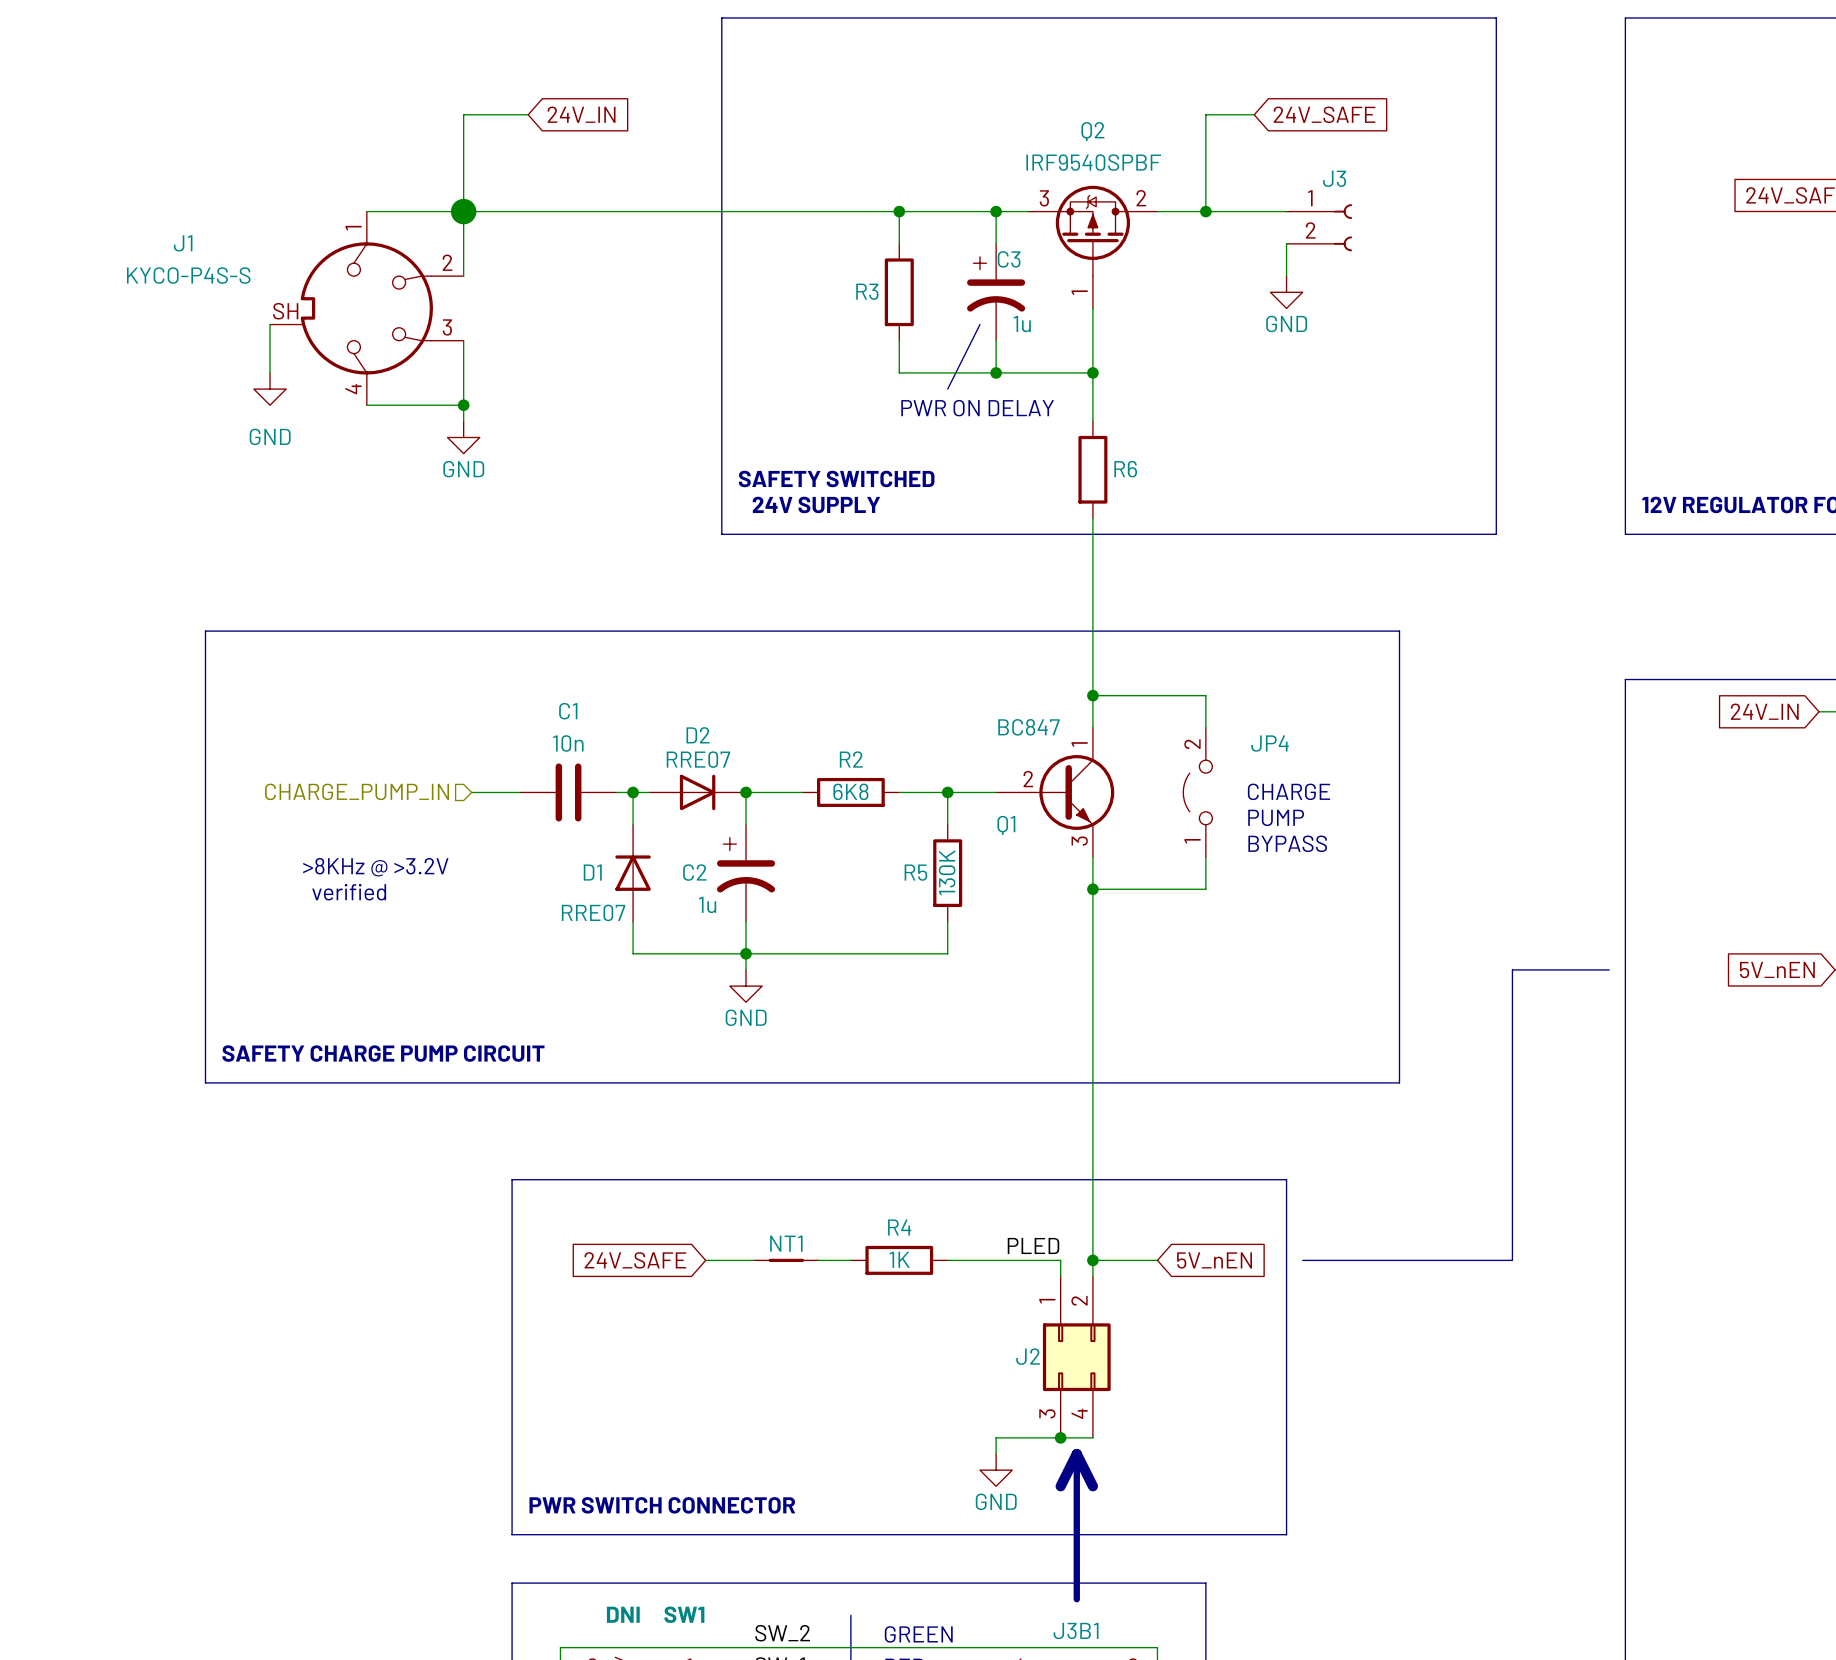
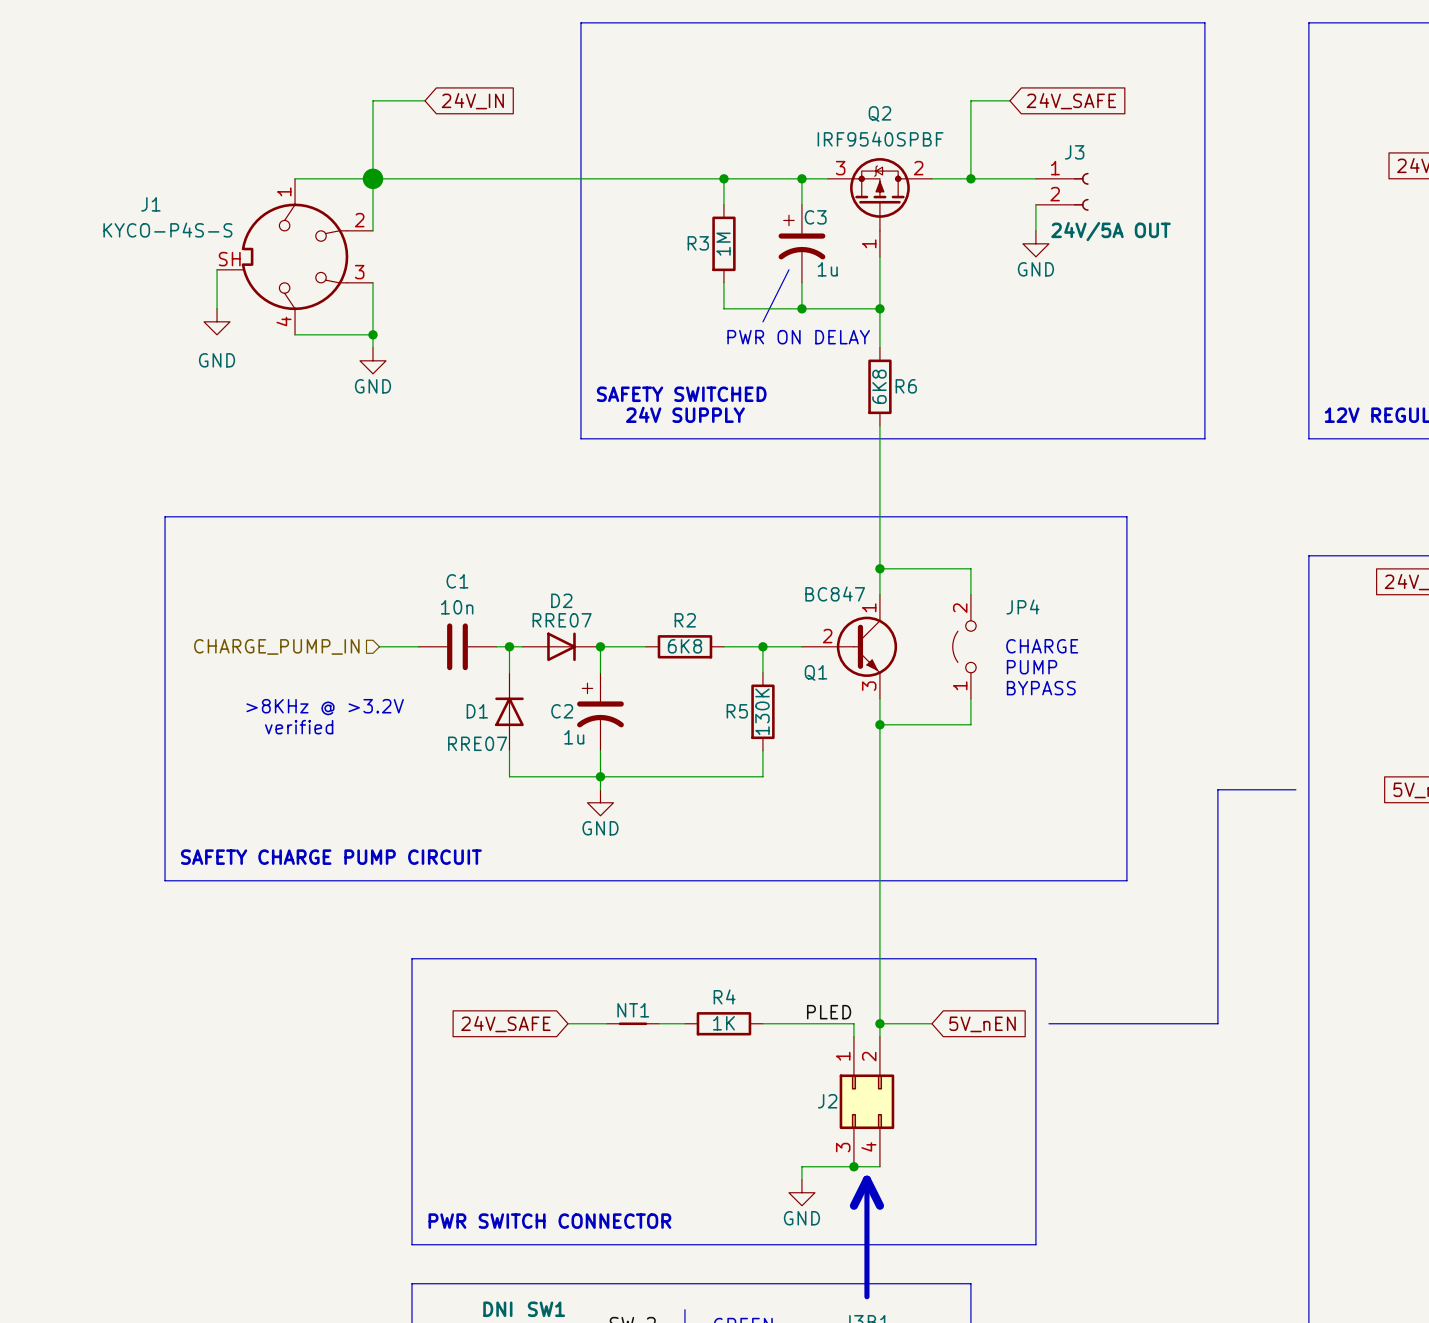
J3 value: none -> 24V/5A OUT (1111, 231)
R3 value: none -> 1M (723, 244)
R6 value: none -> 6K8 (879, 386)

